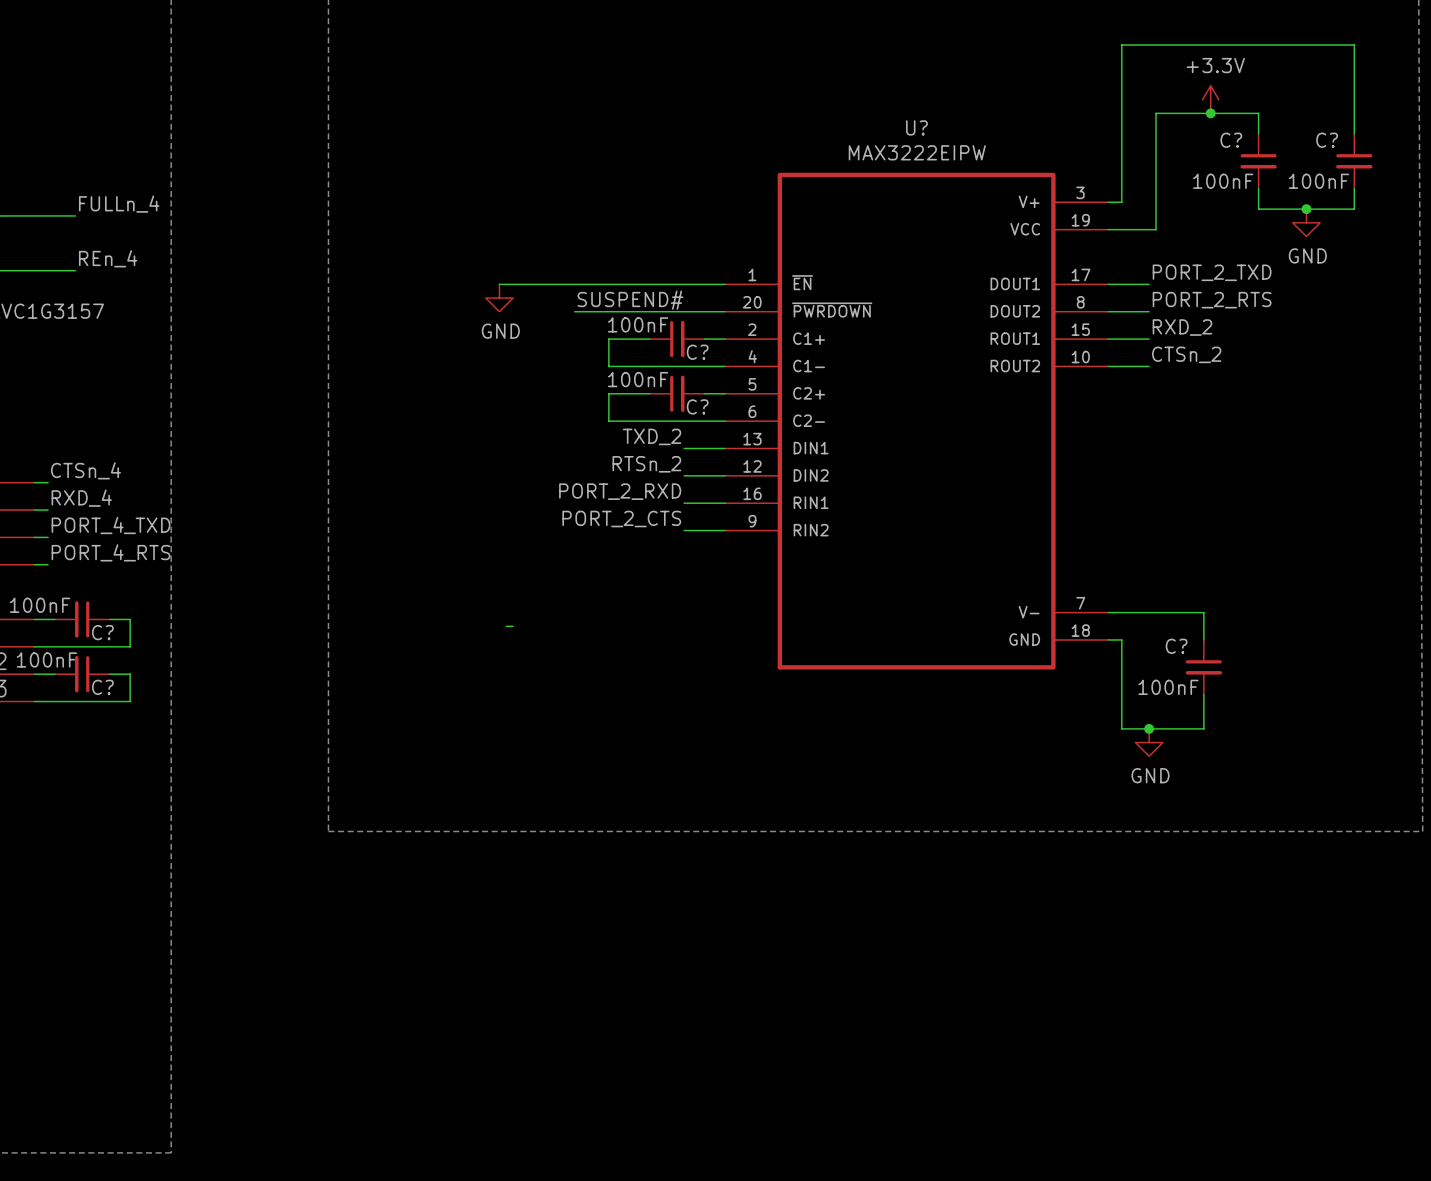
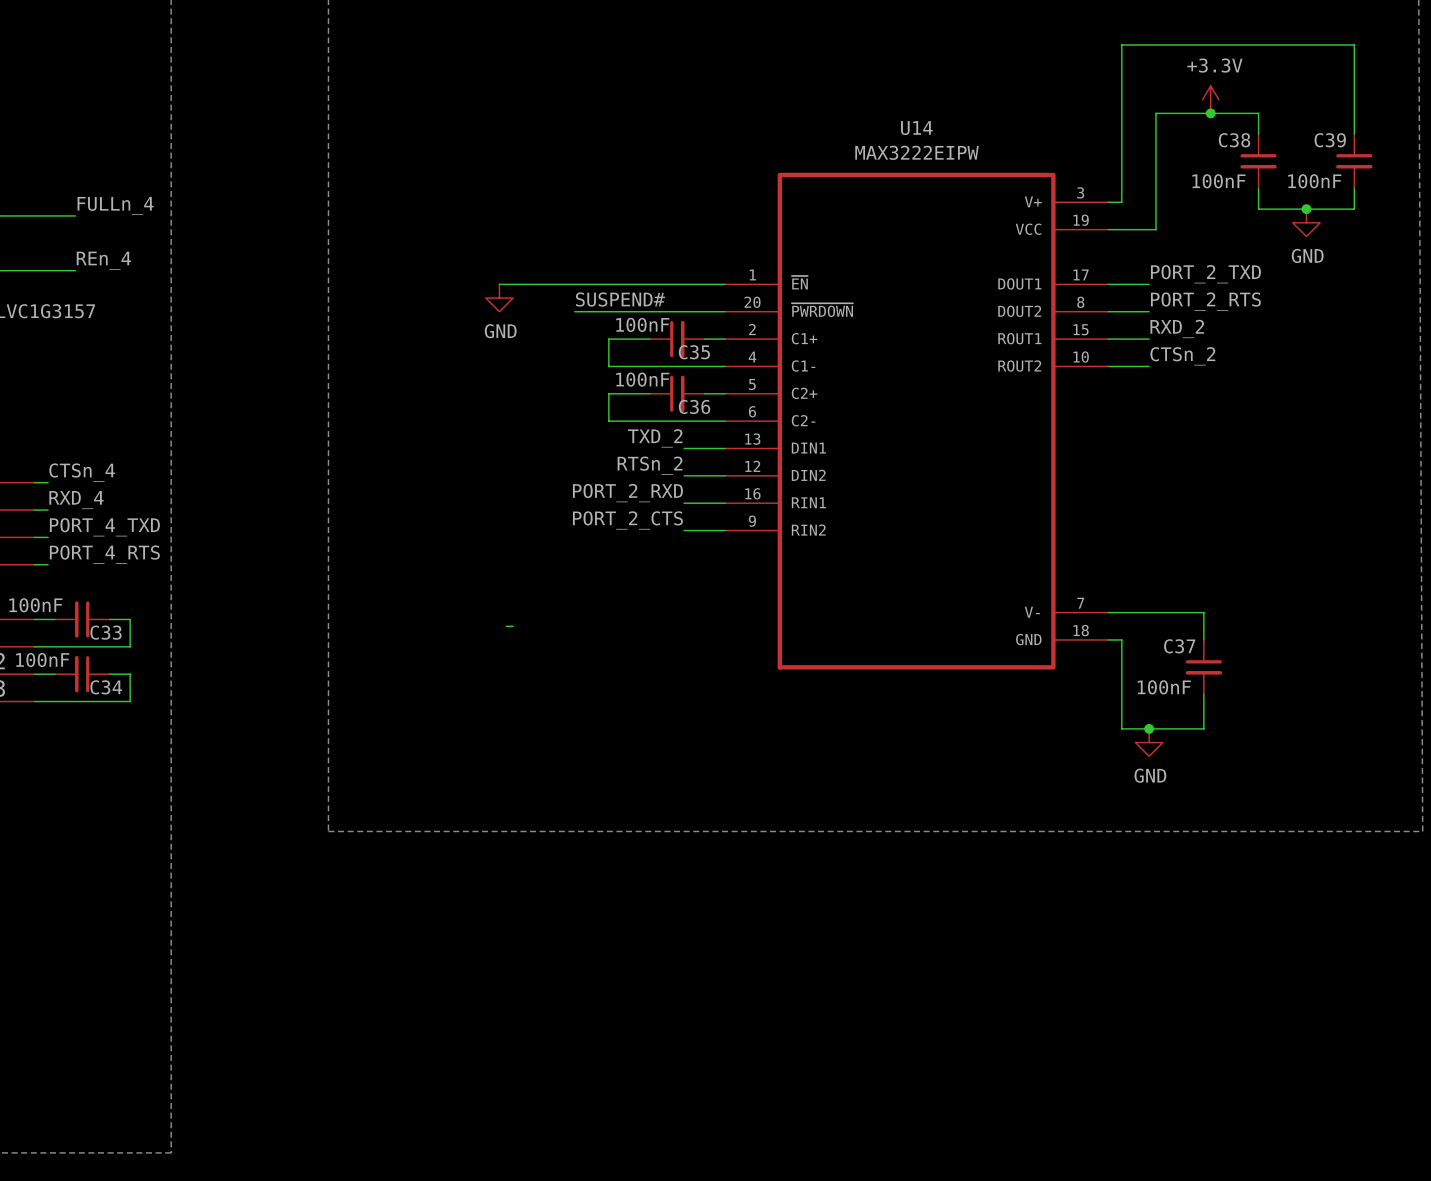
U? name: U? (916, 127) -> U14 (916, 128)
C? name: C? (1231, 140) -> C38 (1234, 140)
C? name: C? (1327, 140) -> C39 (1330, 140)
C? name: C? (697, 352) -> C35 (694, 352)
C? name: C? (697, 406) -> C36 (694, 406)
C? name: C? (102, 632) -> C33 (105, 632)
C? name: C? (1176, 646) -> C37 (1179, 646)
C? name: C? (102, 687) -> C34 (106, 687)

